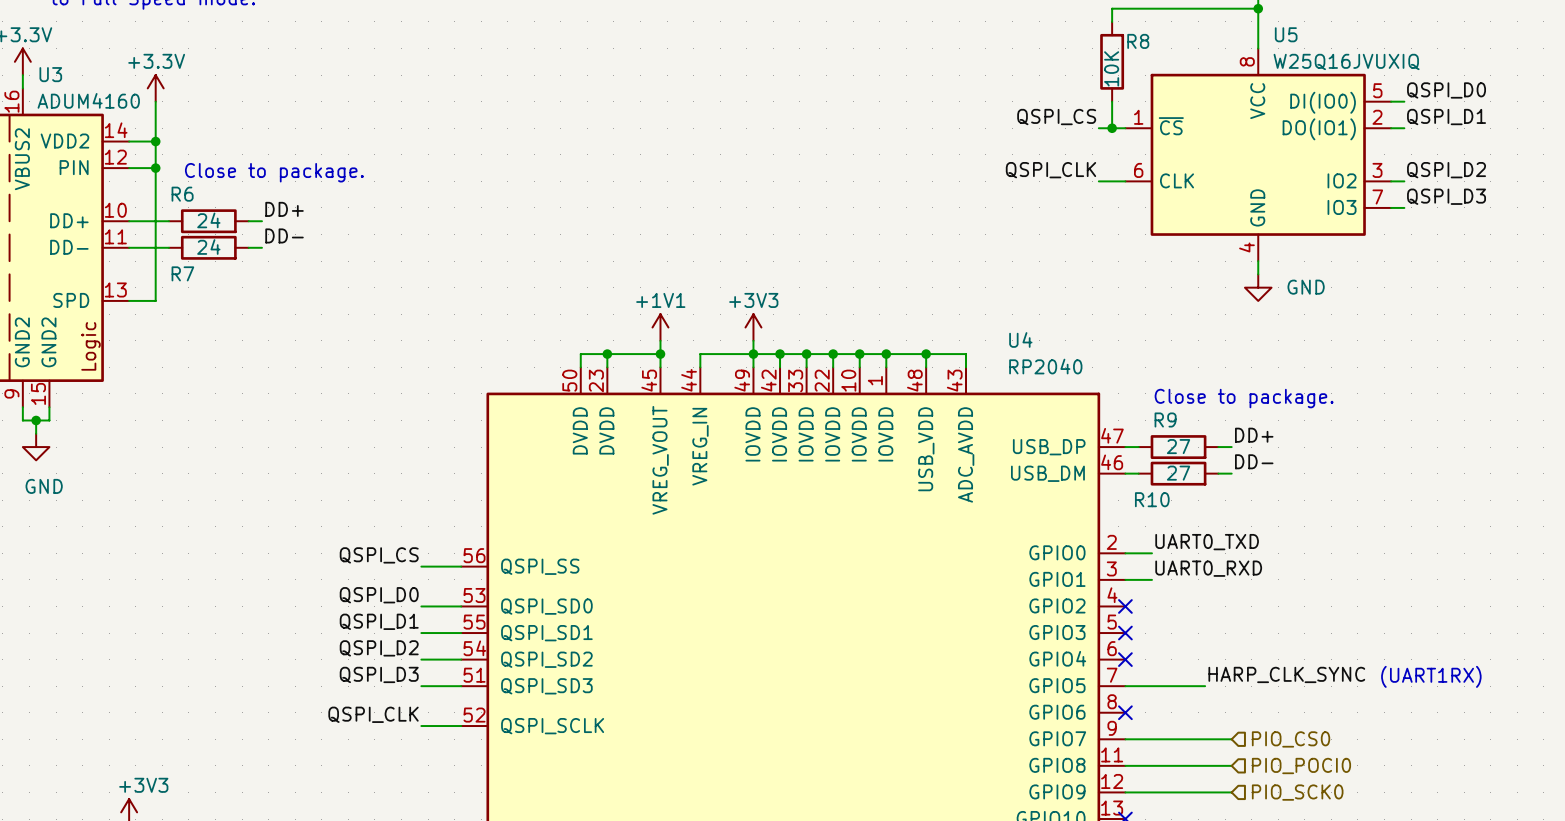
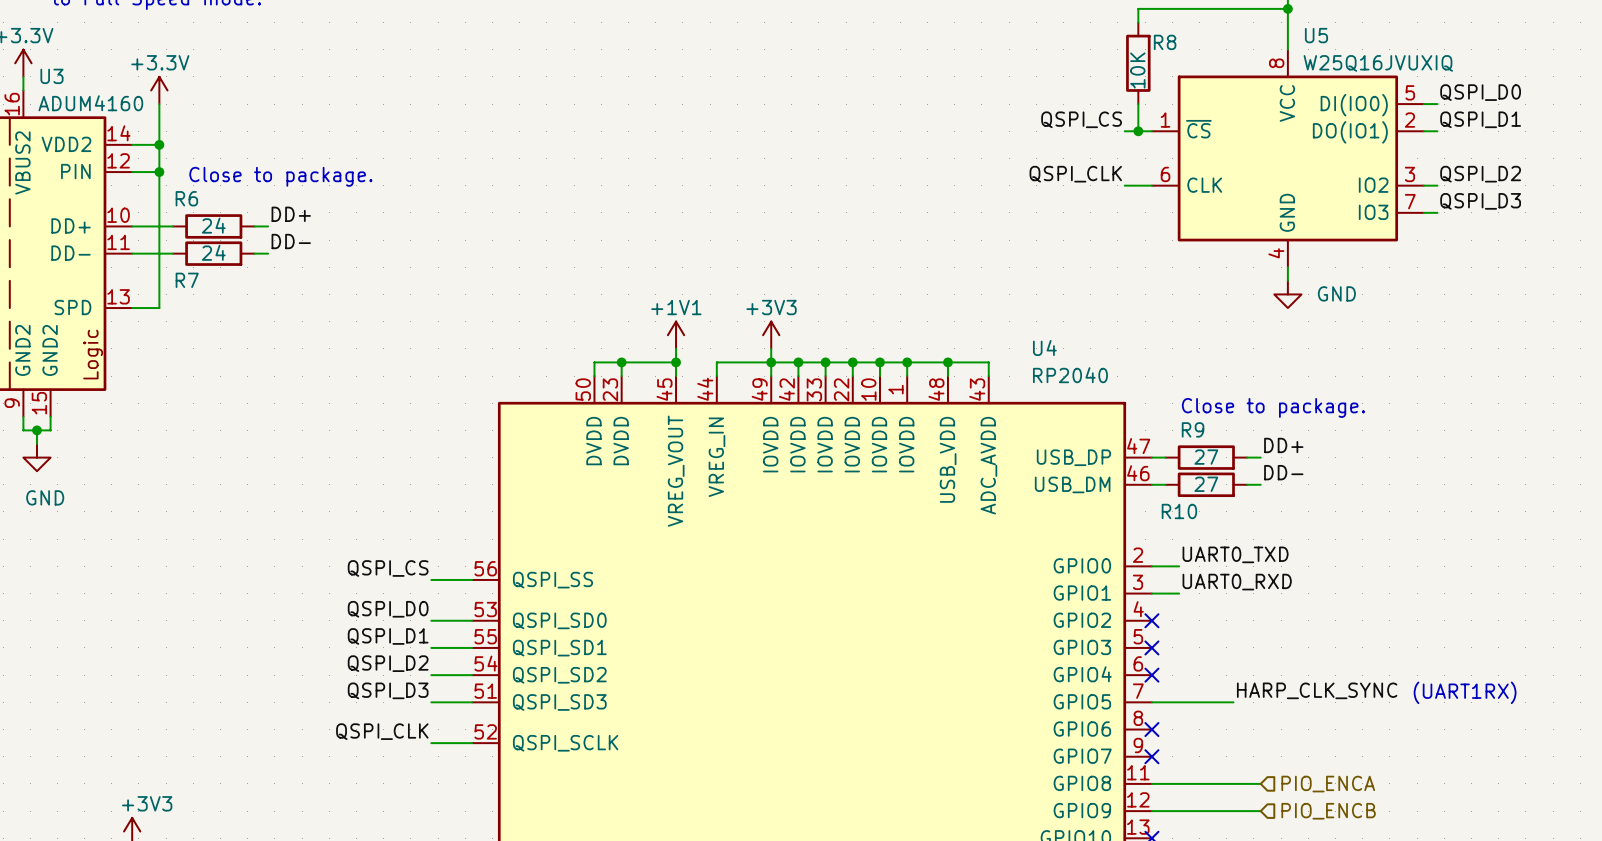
wire: (1125, 739) (1231, 739) -> none
no-connect mark: none -> (1151, 756)
hierarchical label: PIO_CS0 (1291, 739) -> none
hierarchical label: PIO_POCI0 (1301, 766) -> PIO_ENCA (1328, 784)
hierarchical label: PIO_SCK0 (1297, 792) -> PIO_ENCB (1328, 811)

